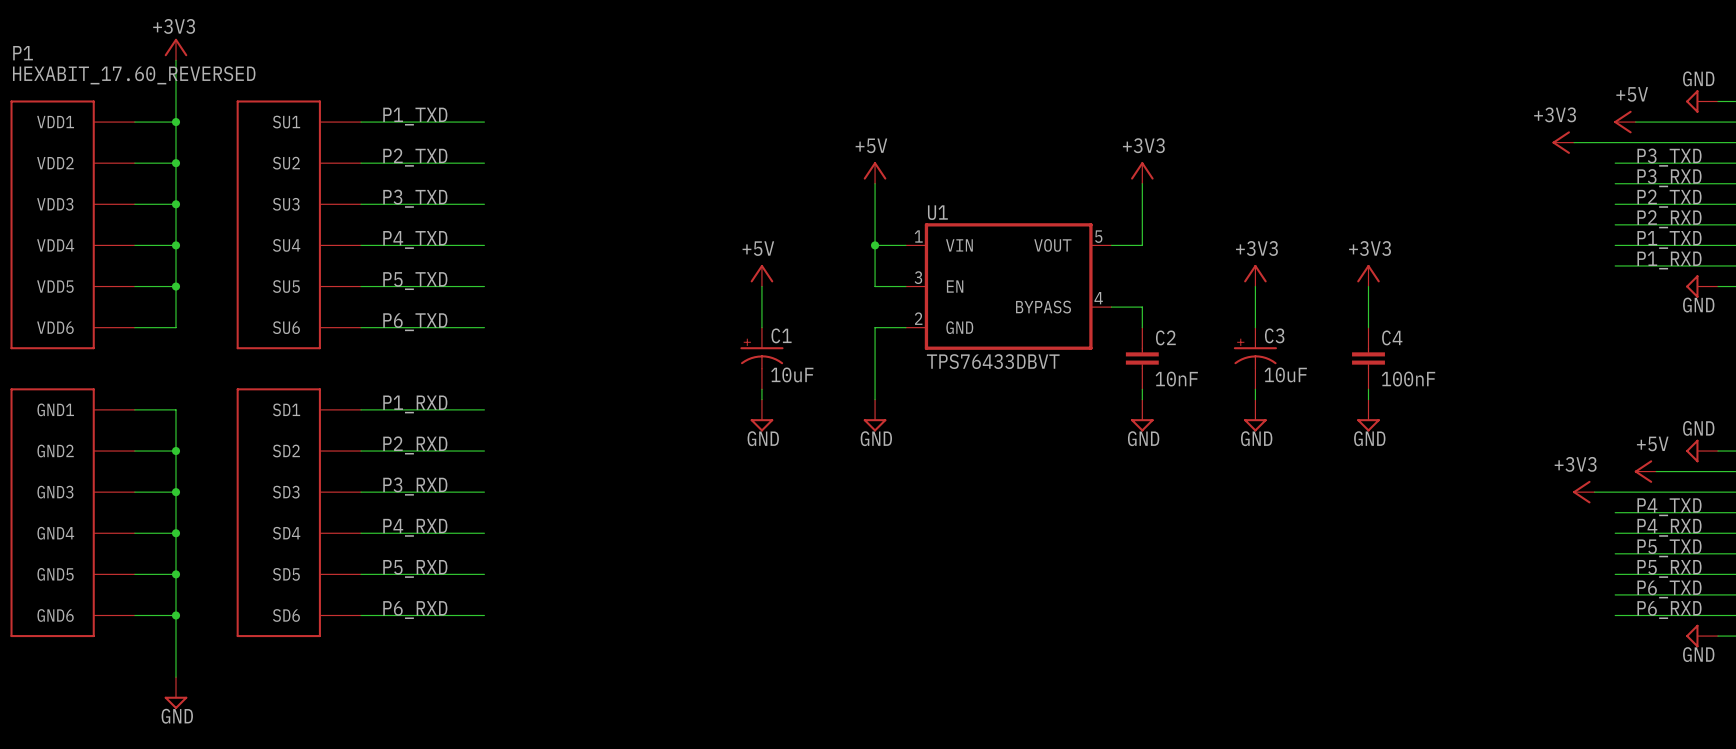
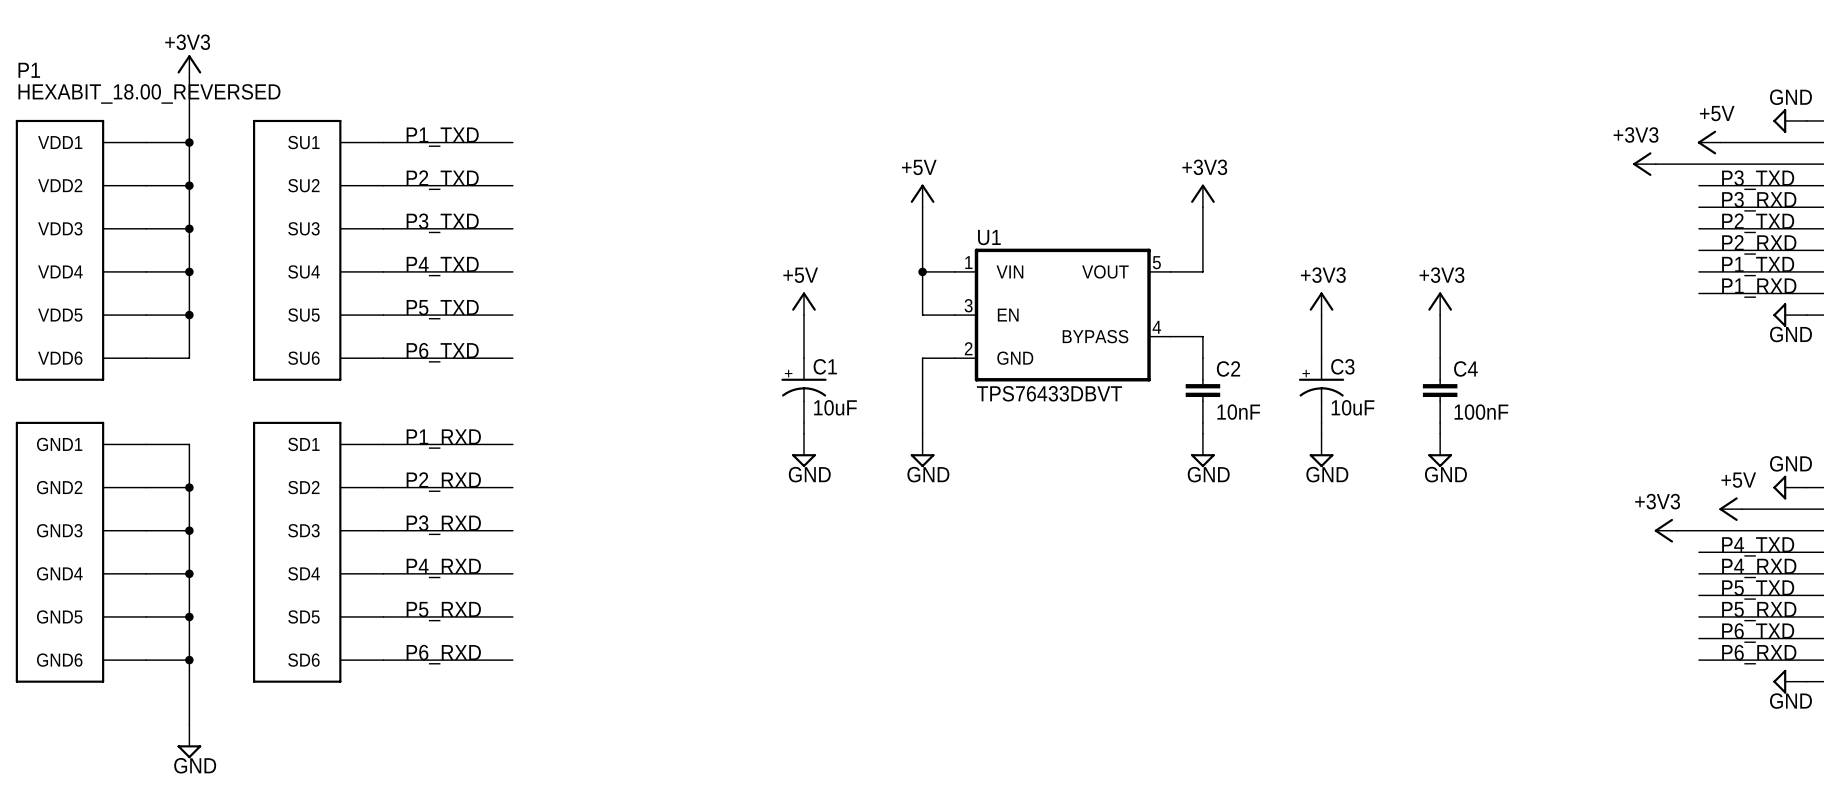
P1 value: HEXABIT_17.60_REVERSED (134, 75) -> HEXABIT_18.00_REVERSED (149, 93)

